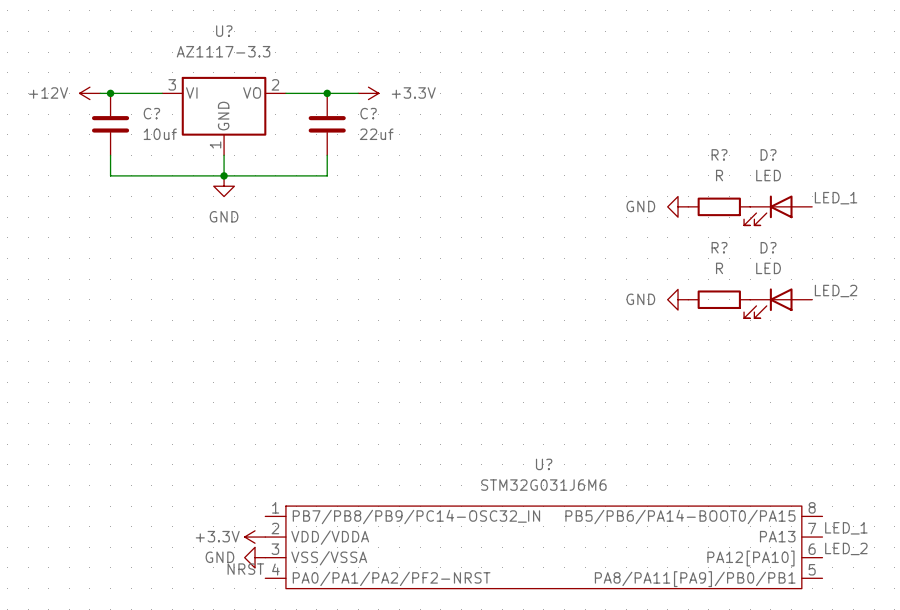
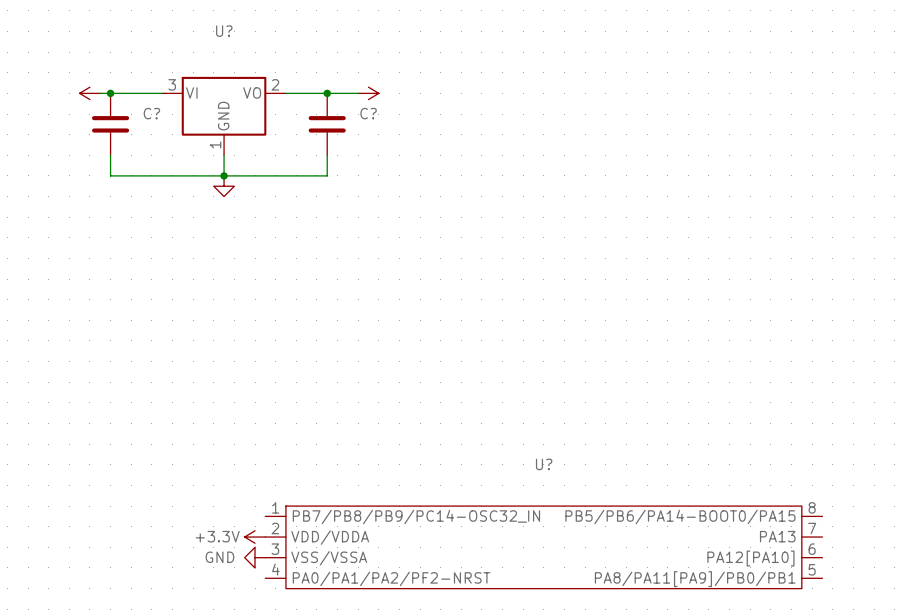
U? value: AZ1117-3.3 (223, 51) -> none
power symbol text: +12V (48, 92) -> none
power symbol text: +3.3V (413, 92) -> none
C? value: 10uf (160, 134) -> none
C? value: 22uf (376, 134) -> none
label: LED_1 (836, 198) -> none
power symbol: GND (678, 206) -> none
R?: R (719, 206) -> none
D?: LED (778, 210) -> none
power symbol text: GND (224, 216) -> none
label: LED_2 (836, 291) -> none
power symbol: GND (678, 299) -> none
R?: R (719, 299) -> none
D?: LED (778, 303) -> none
U? value: STM32G031J6M6 (543, 485) -> none
label: LED_1 (846, 528) -> none
label: LED_2 (846, 548) -> none
label: NRST (245, 569) -> none

